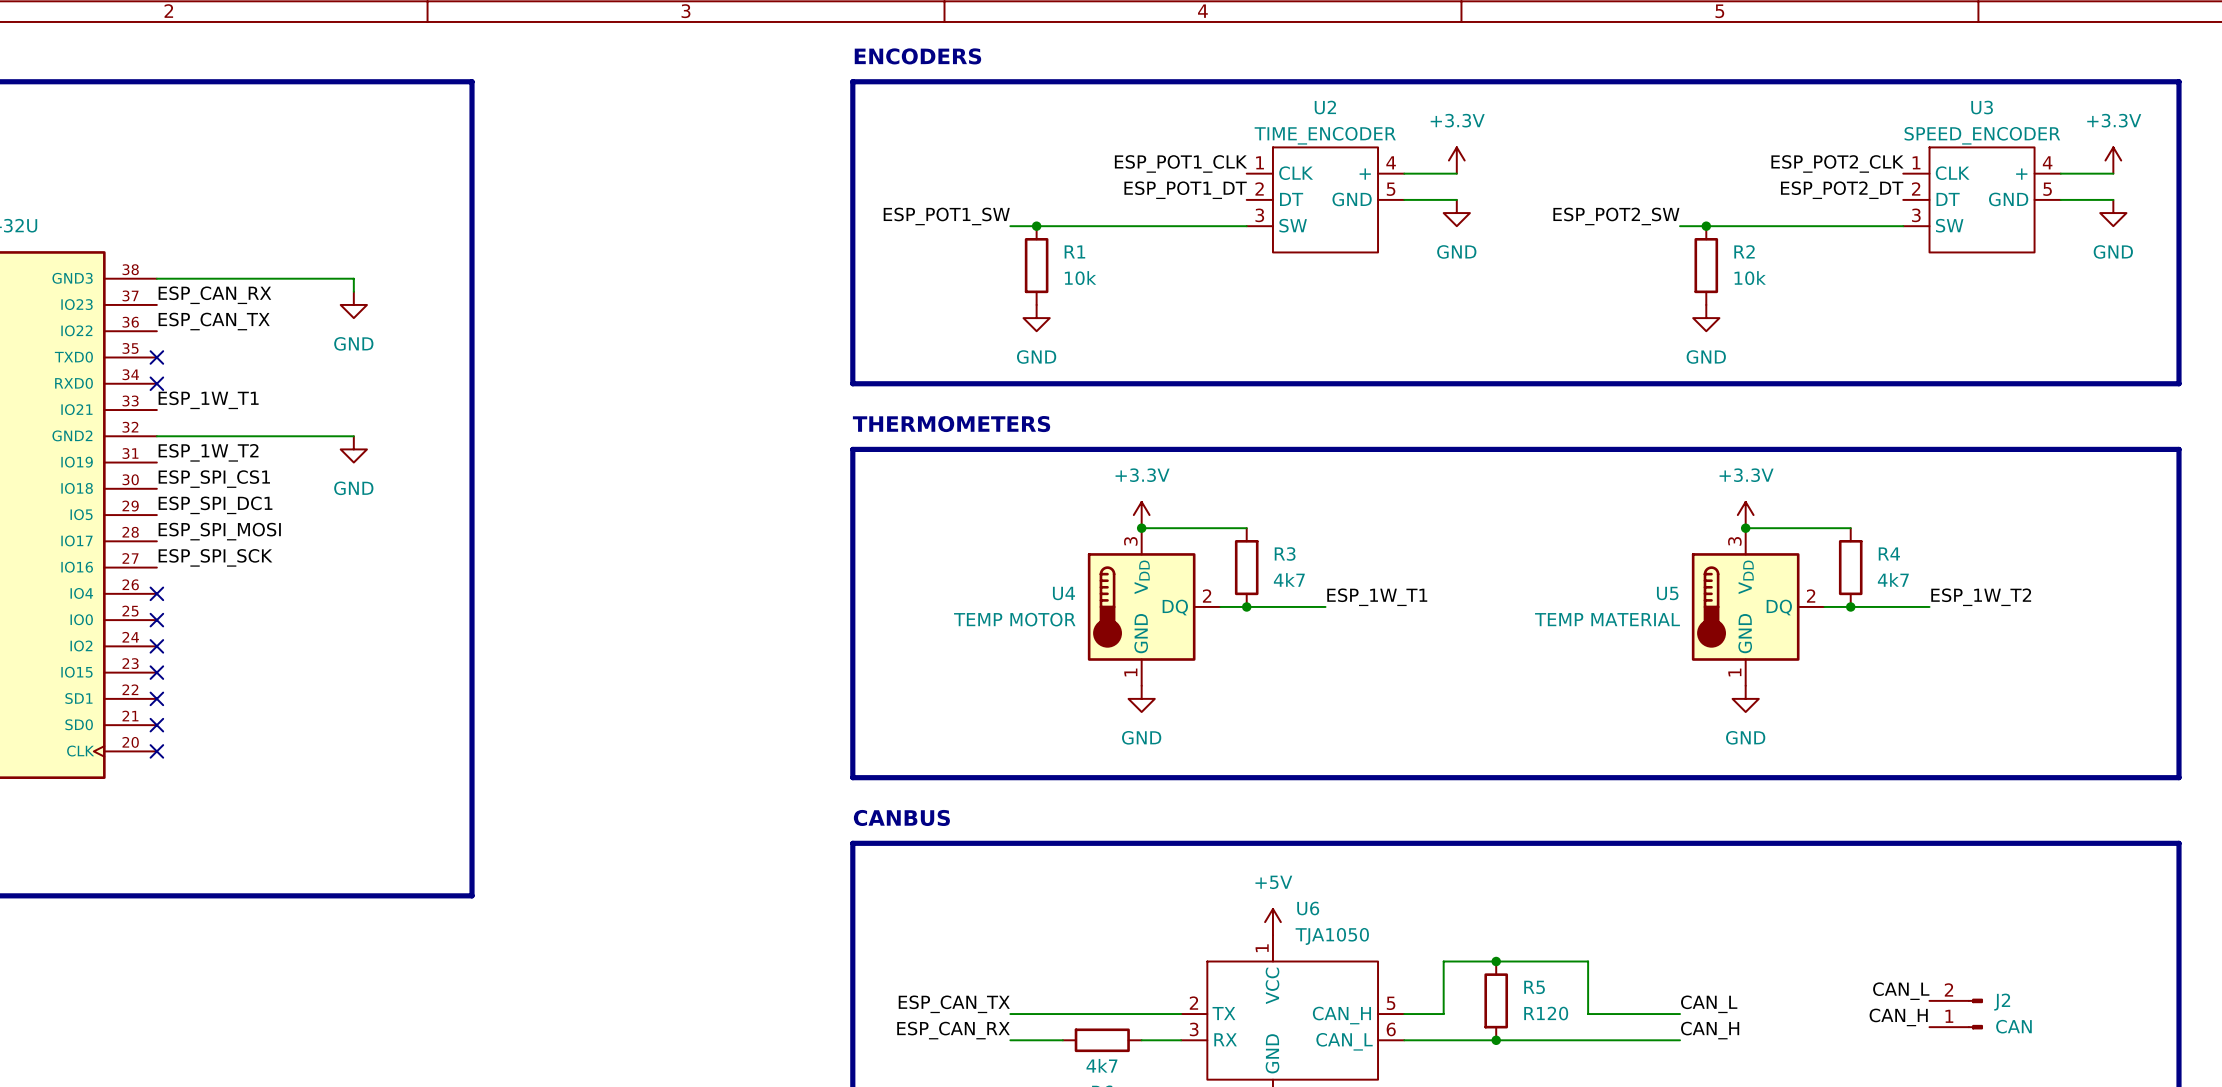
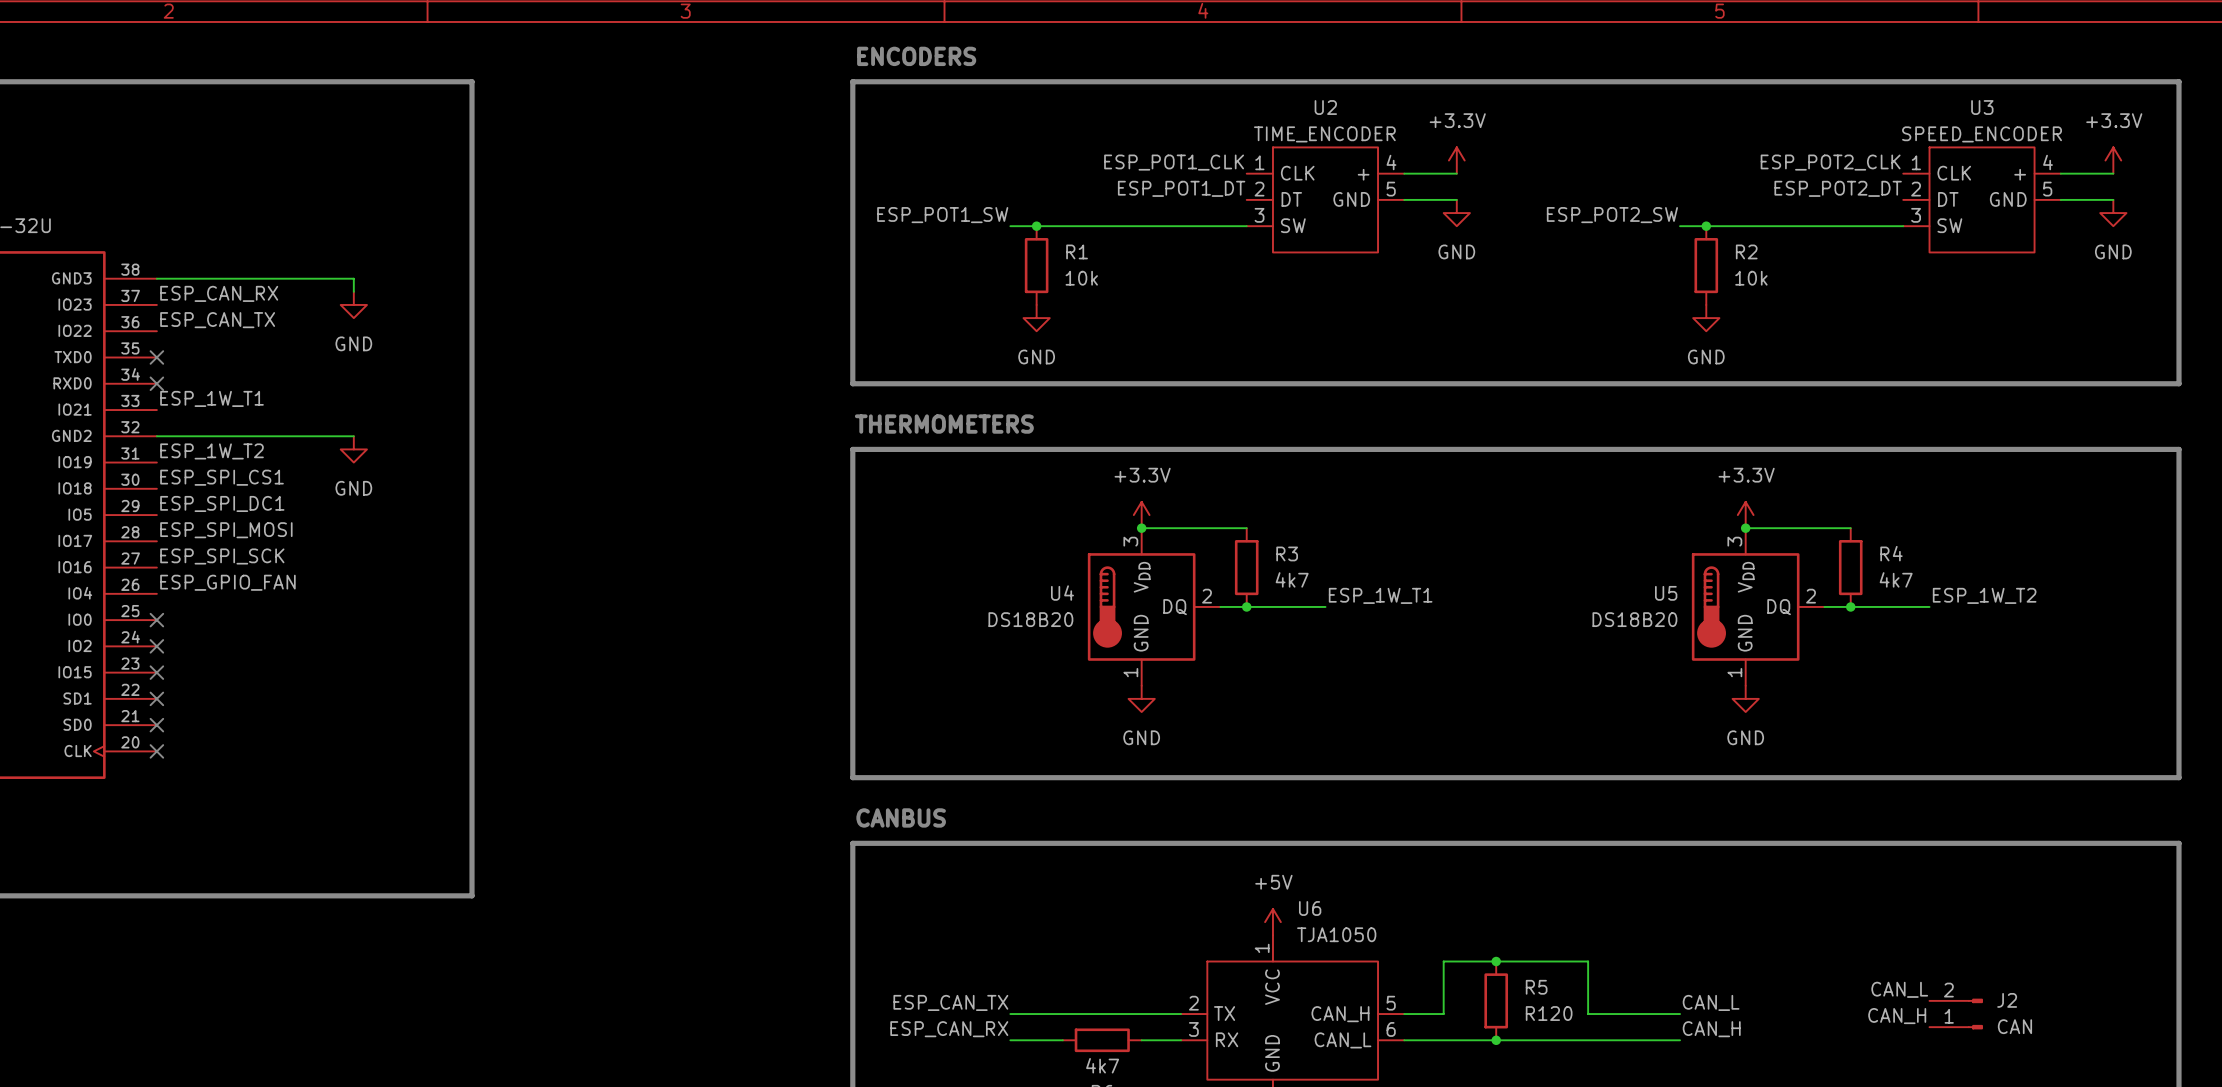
label: none -> ESP_GPIO_FAN (227, 582)
no-connect mark: (156, 593) -> none
U4 value: TEMP MOTOR (1014, 619) -> DS18B20 (1030, 619)
U5 value: TEMP MATERIAL (1607, 619) -> DS18B20 (1634, 619)

